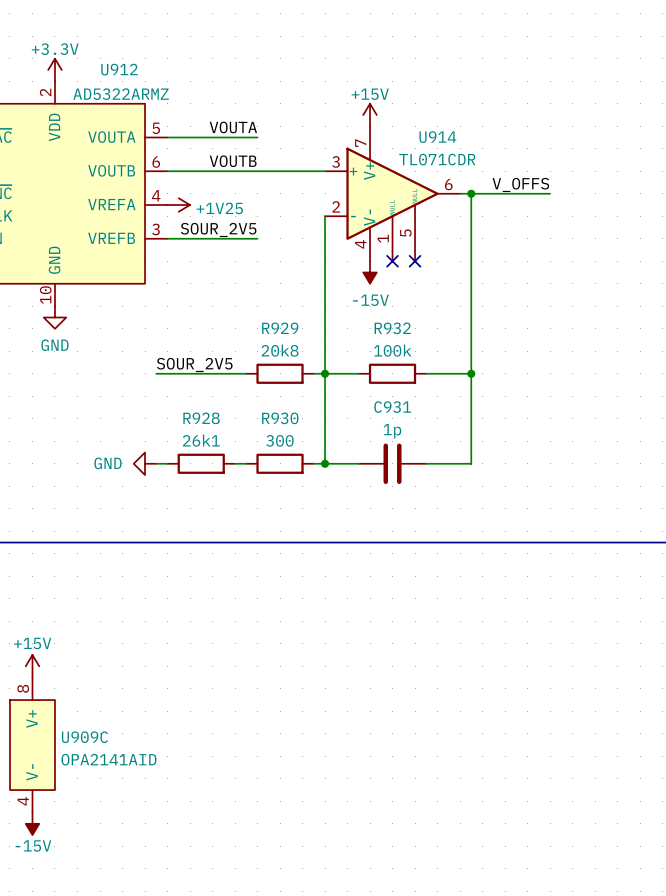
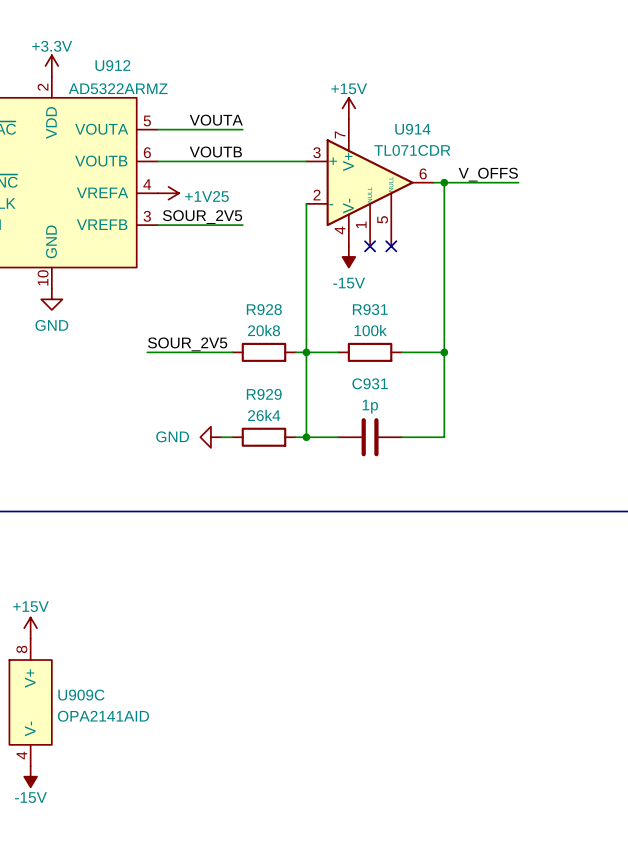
R929 name: R929 (280, 328) -> R928 (264, 309)
R932 name: R932 (392, 328) -> R931 (370, 309)
R930 name: R930 (280, 418) -> R929 (264, 394)
R930 value: 300 (279, 440) -> 26k4 (264, 415)
power symbol position: GND (145, 463) -> GND (210, 437)
wire: (156, 463) (167, 463) -> none
R928: 26k1 (201, 463) -> none

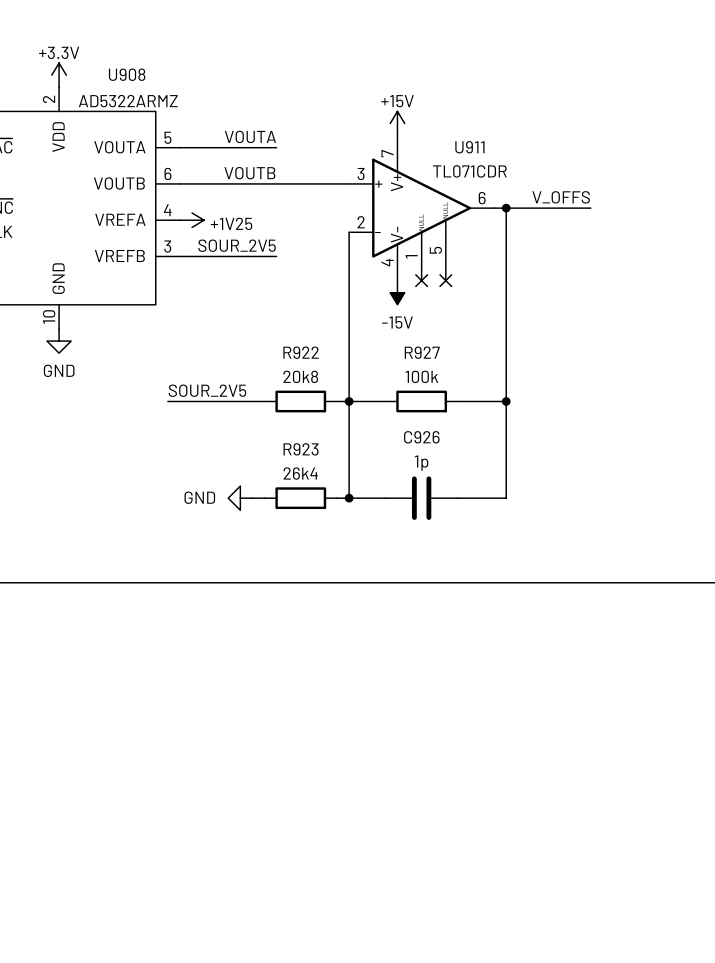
U912 name: U912 (112, 65) -> U908 (127, 74)
U914 name: U914 (412, 129) -> U911 (469, 147)
R928 name: R928 (264, 309) -> R922 (301, 352)
R931 name: R931 (370, 309) -> R927 (422, 352)
C931 name: C931 (370, 383) -> C926 (421, 437)
R929 name: R929 (264, 394) -> R923 (301, 449)
power symbol: +15V (30, 628) -> none
U909C: OPA2141AID (30, 702) -> none
power symbol: -15V (30, 776) -> none

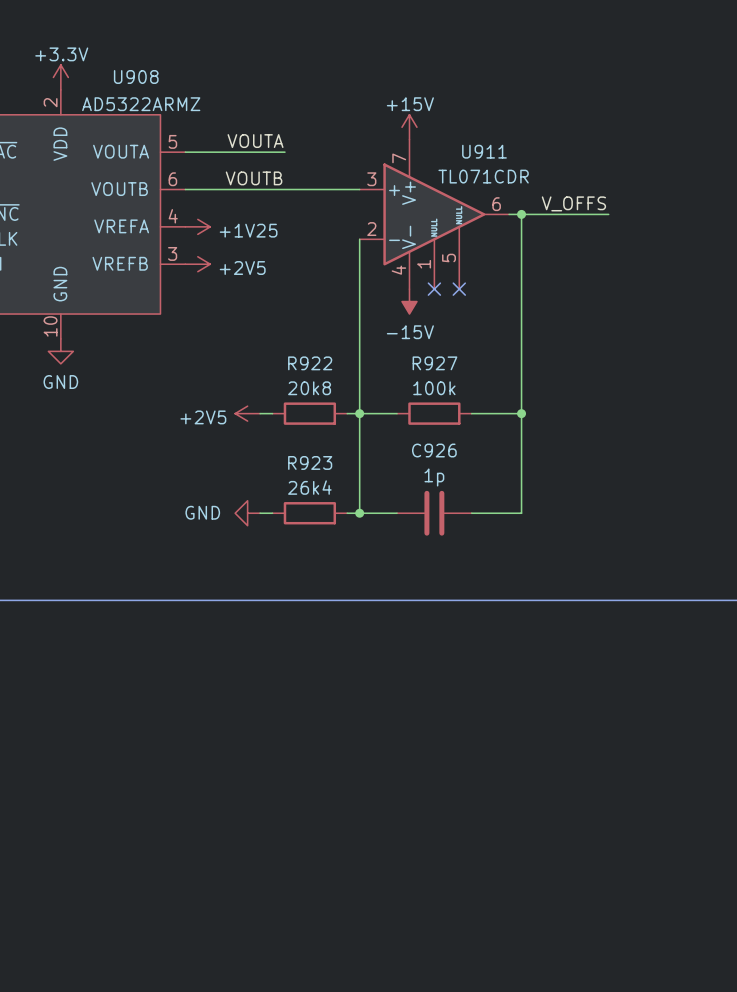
label: SOUR_2V5 (237, 245) -> none
wire: (179, 256) (276, 256) -> none
power symbol: none -> +2V5 (197, 264)
label: SOUR_2V5 (207, 390) -> none
wire: (167, 401) (252, 401) -> none
power symbol: none -> +2V5 (247, 413)

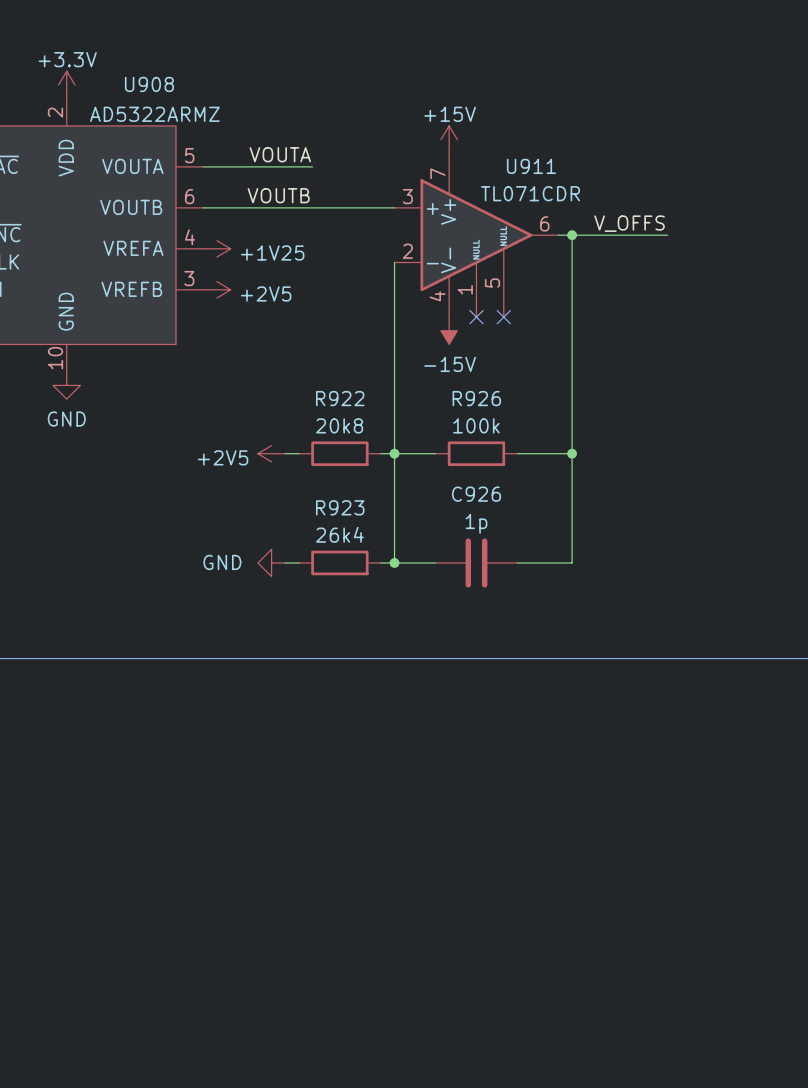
R927 name: R927 (434, 363) -> R926 (476, 398)

